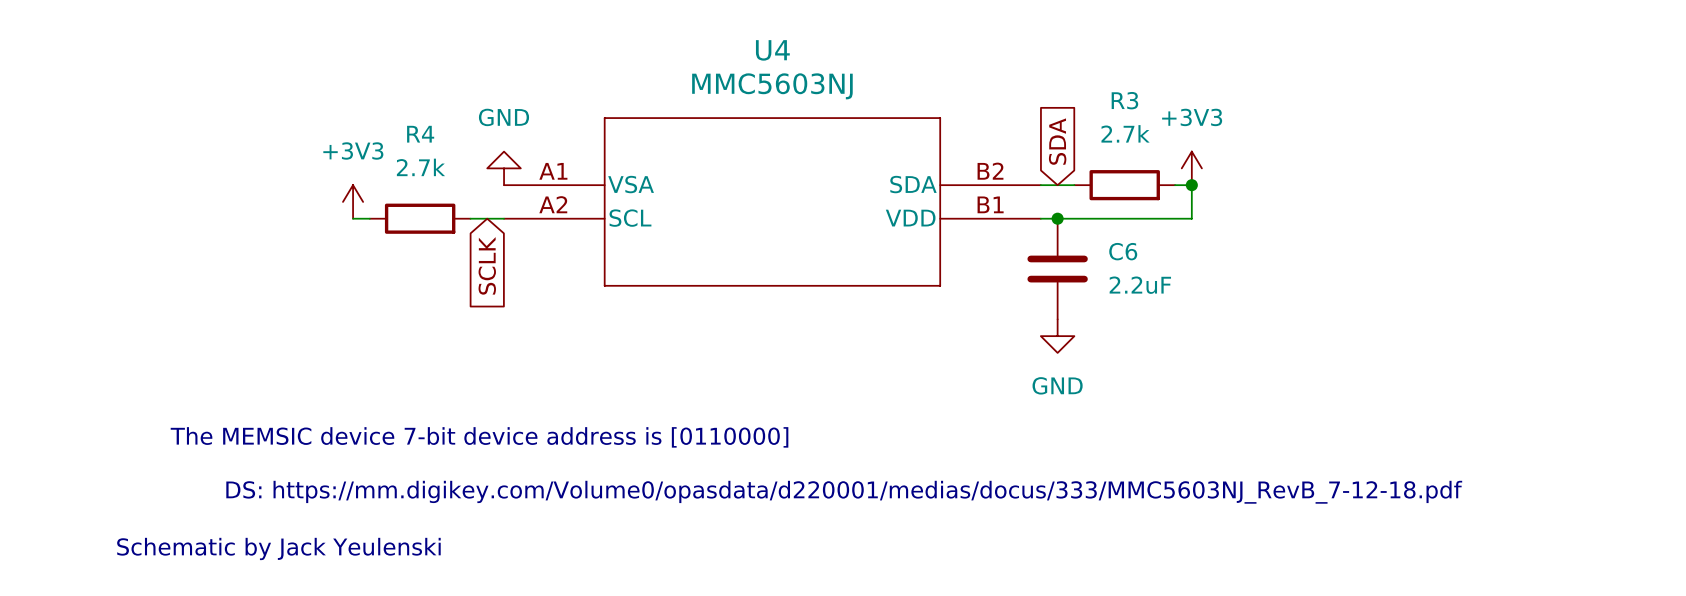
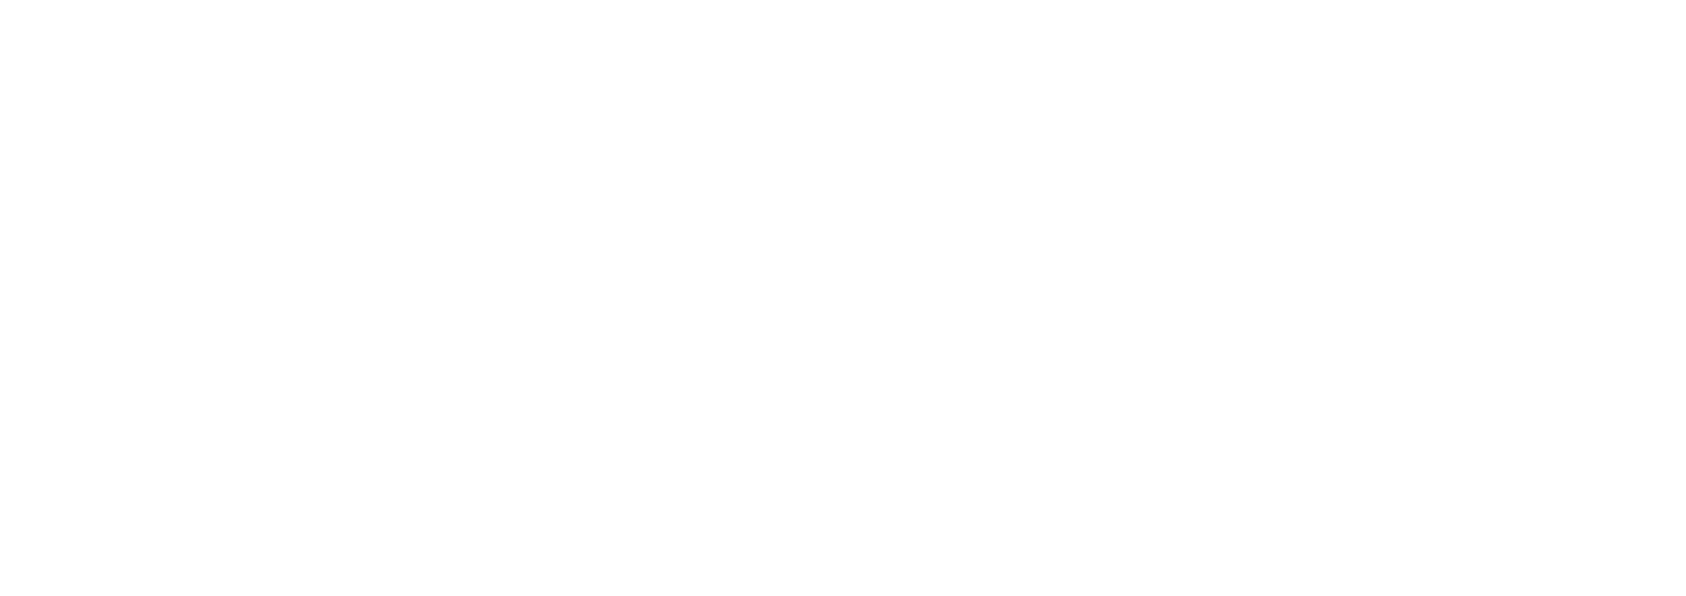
global label: SDA (1057, 141) -> none
power symbol: GND (504, 168) -> none
power symbol: +3V3 (1191, 168) -> none
wire: (1040, 185) (1074, 185) -> none
R3: 2.7k (1124, 185) -> none
wire: (1175, 185) (1191, 185) (1191, 218) (1040, 218) -> none
junction: (1191, 185) -> none
power symbol: +3V3 (353, 201) -> none
U4: MMC5603NJ (772, 201) -> none
wire: (353, 218) (369, 218) -> none
R4: 2.7k (420, 218) -> none
wire: (470, 218) (504, 218) -> none
junction: (1057, 218) -> none
global label: SCLK (487, 265) -> none
C6: 2.2uF (1057, 269) -> none
power symbol: GND (1057, 336) -> none
text: The MEMSIC device 7-bit device address is [0110000] (479, 437) -> none
text: DS: https://mm.digikey.com/Volume0/opasdata/d220001/medias/docus/333/MMC5603NJ_RevB_7-12-18.pdf (844, 492) -> none
text: Schematic by Jack Yeulenski (278, 548) -> none

